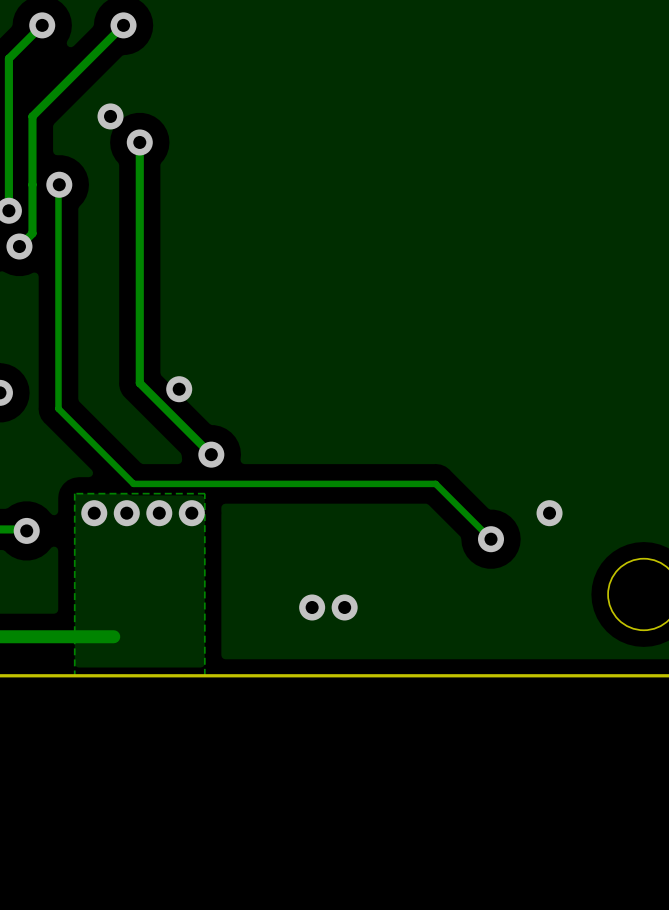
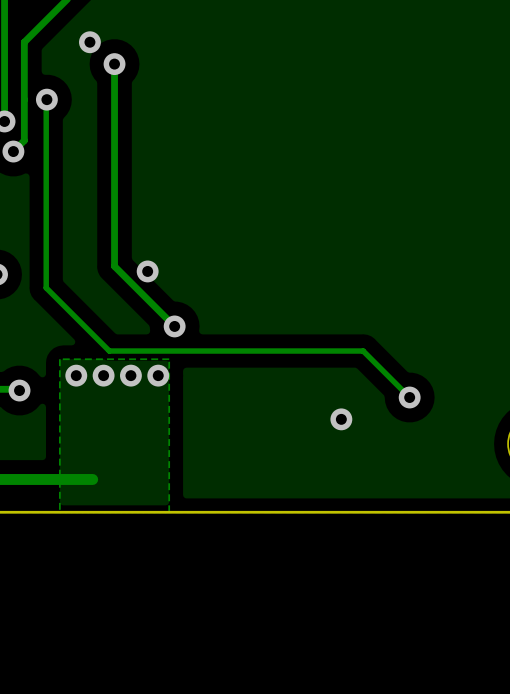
via: (549, 513) -> none
via: none -> (341, 419)
via: (312, 607) -> none
via: (344, 607) -> none

